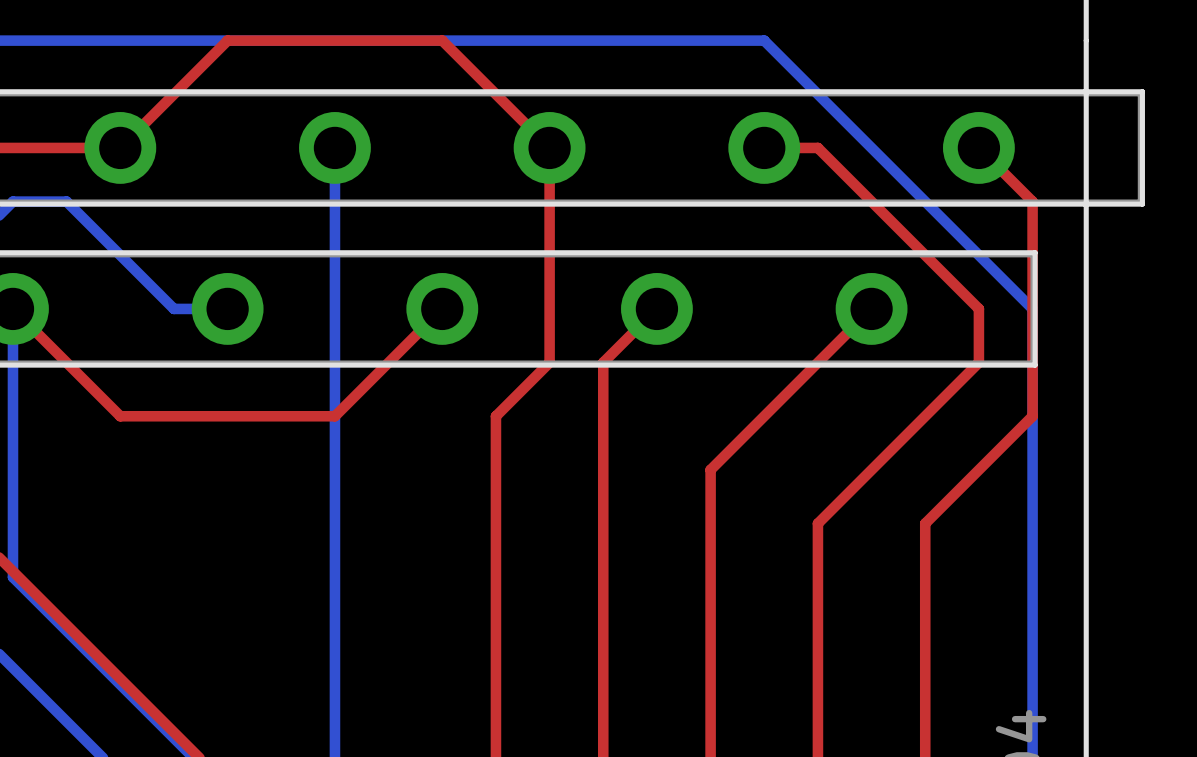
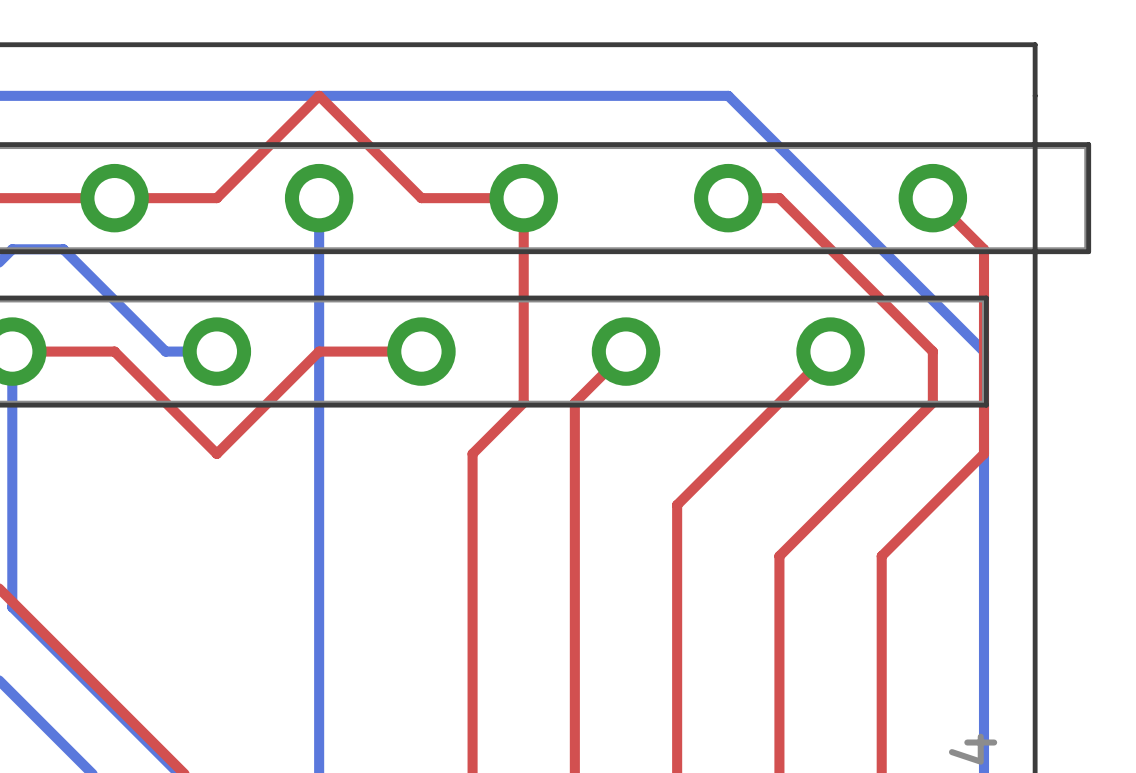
top track: (120, 147) (227, 40) (442, 40) (549, 147) -> (114, 198) (216, 198) (319, 95) (421, 198) (523, 198)
top track: (12, 308) (120, 416) (334, 416) (442, 308) -> (12, 351) (114, 351) (216, 453) (319, 351) (421, 351)

